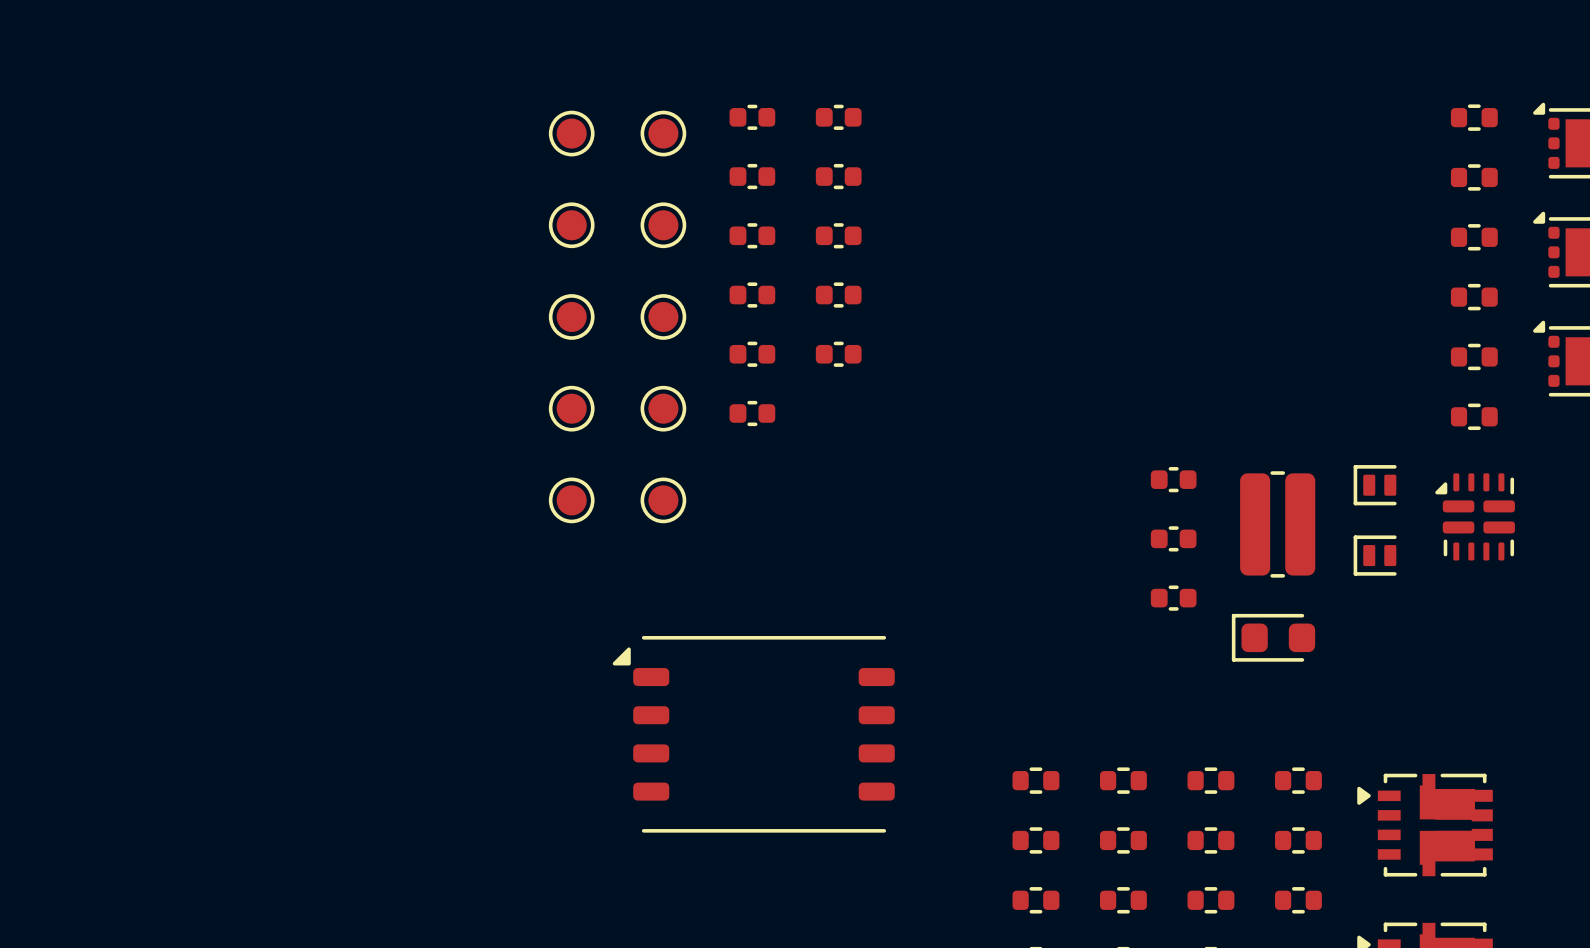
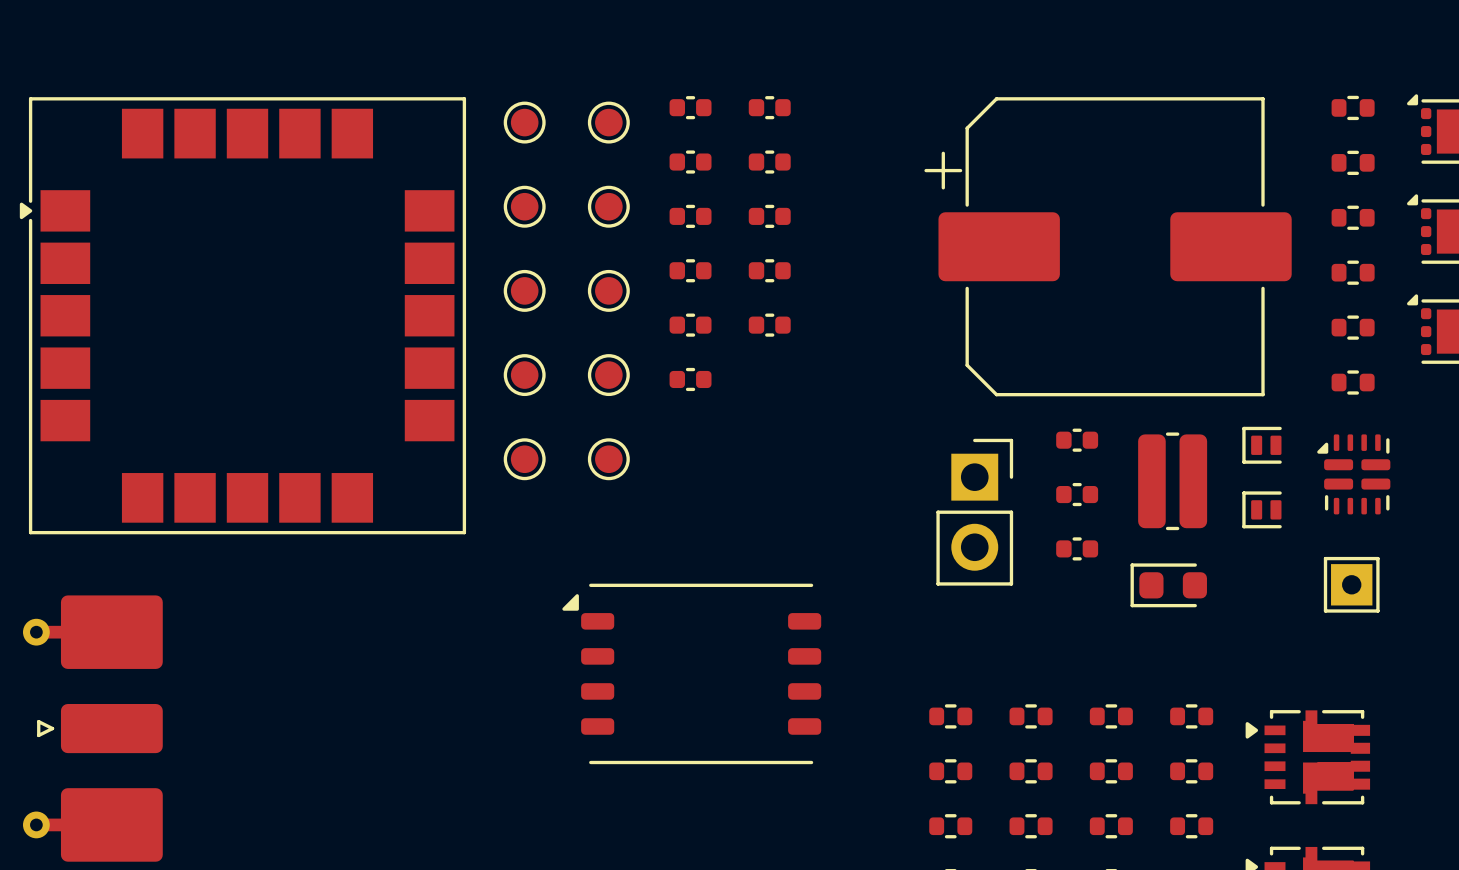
part: none -> (1108, 246)
part: none -> (242, 315)
part: none -> (974, 512)
part: none -> (1351, 584)
part: none -> (92, 728)

